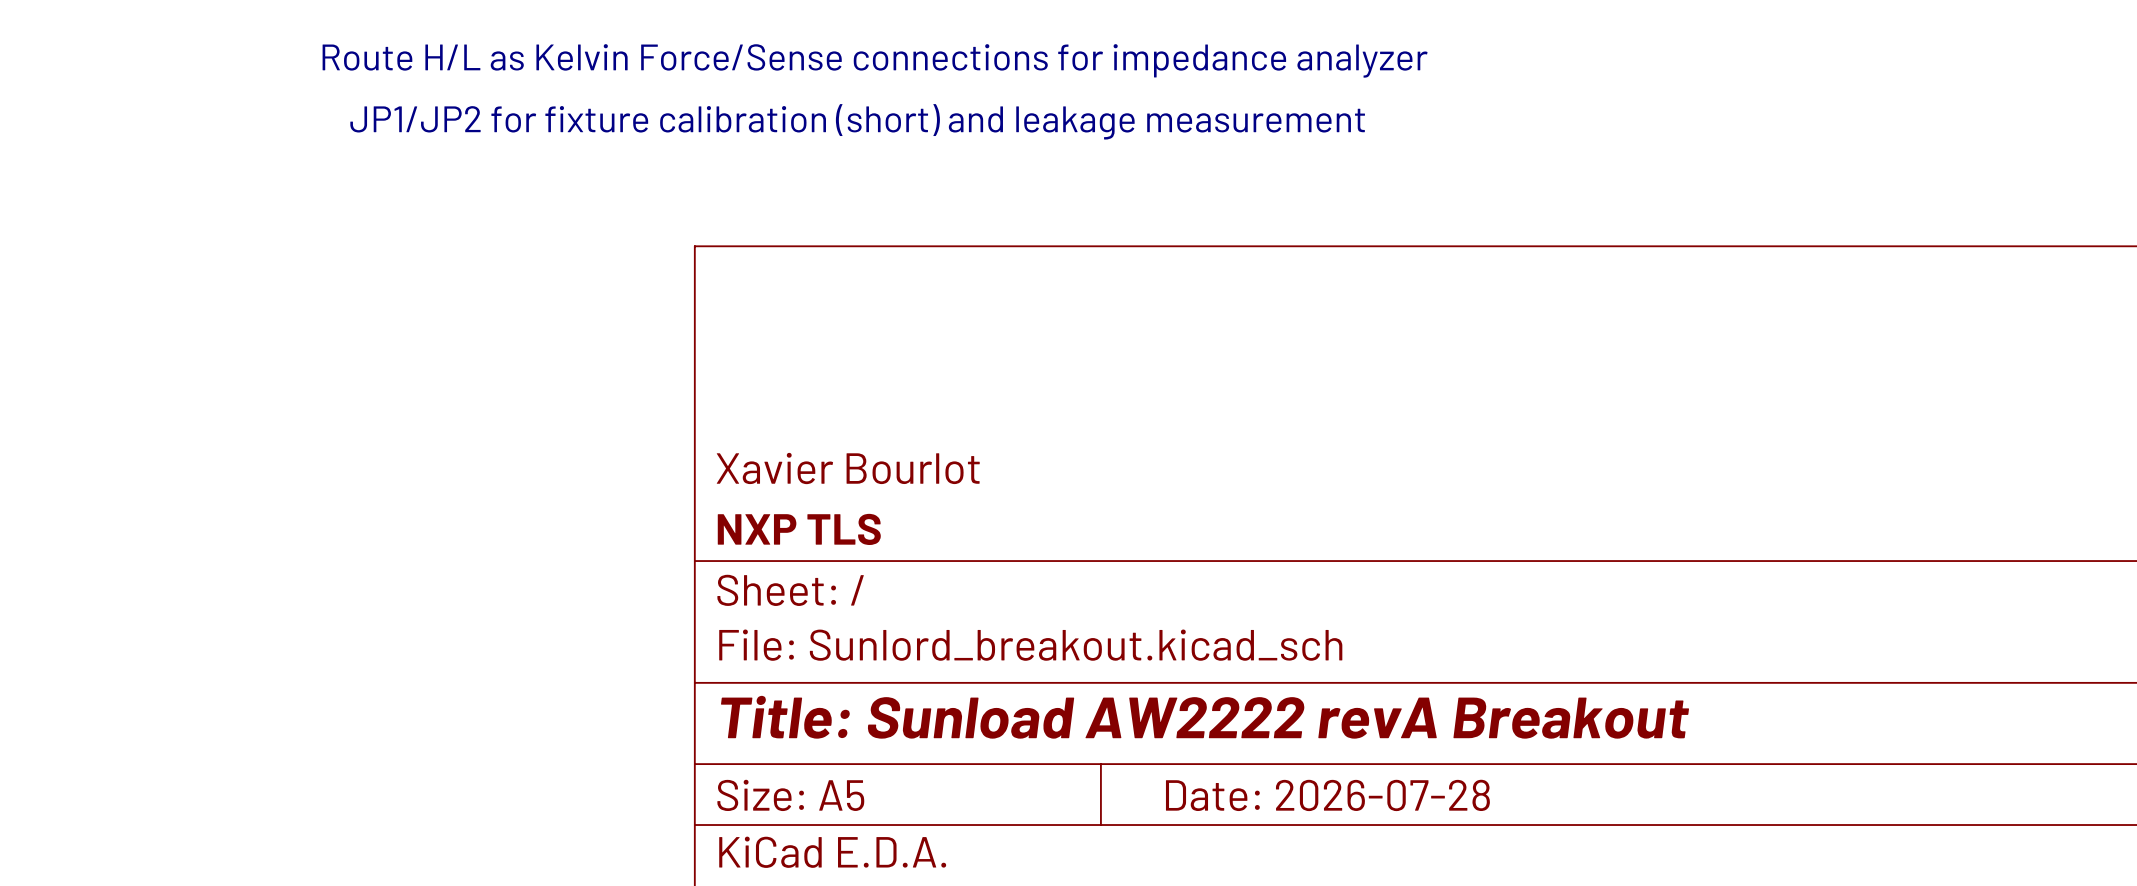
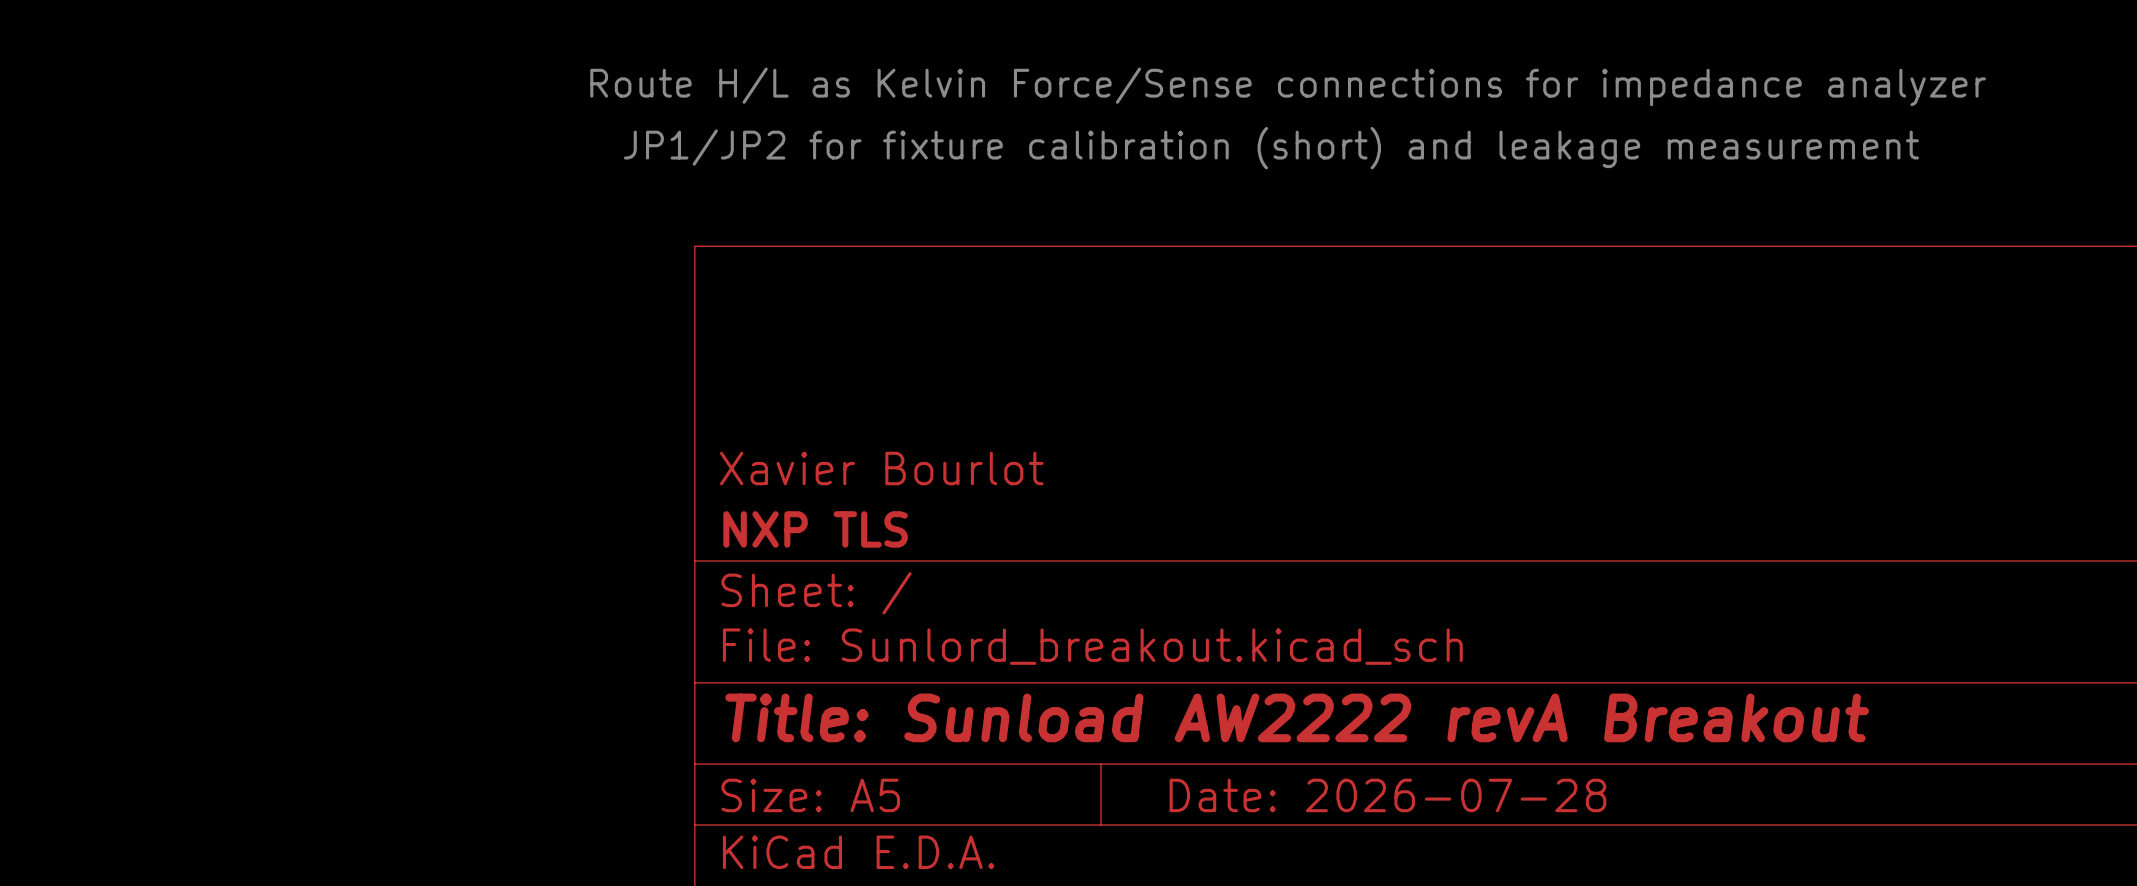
text position: Route H/L as Kelvin Force/Sense connections for impedance analyzer (875, 60) -> Route H/L as Kelvin Force/Sense connections for impedance analyzer (1288, 86)
text position: JP1/JP2 for fixture calibration (short) and leakage measurement (857, 121) -> JP1/JP2 for fixture calibration (short) and leakage measurement (1271, 148)

